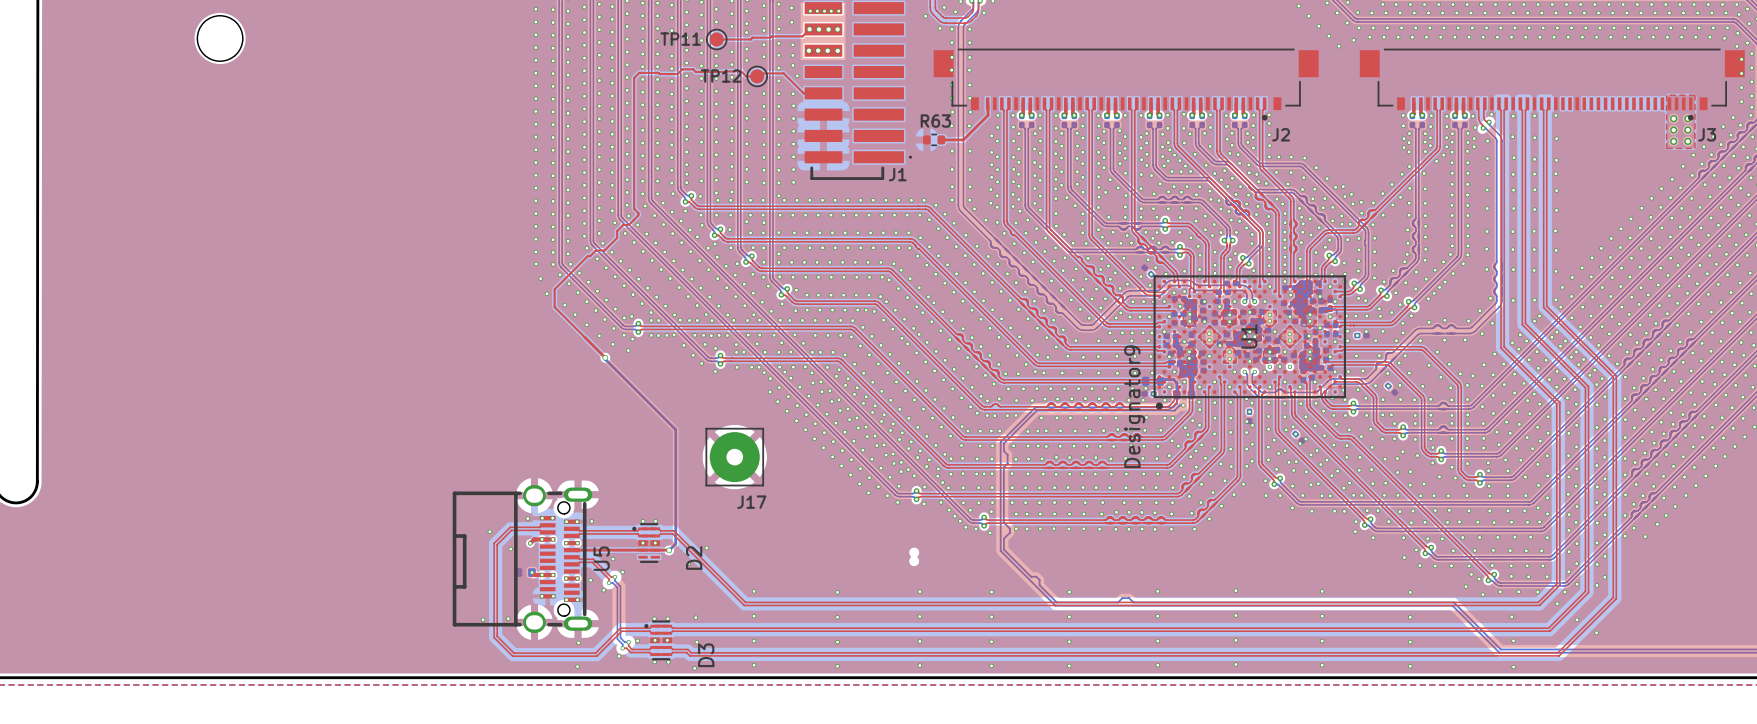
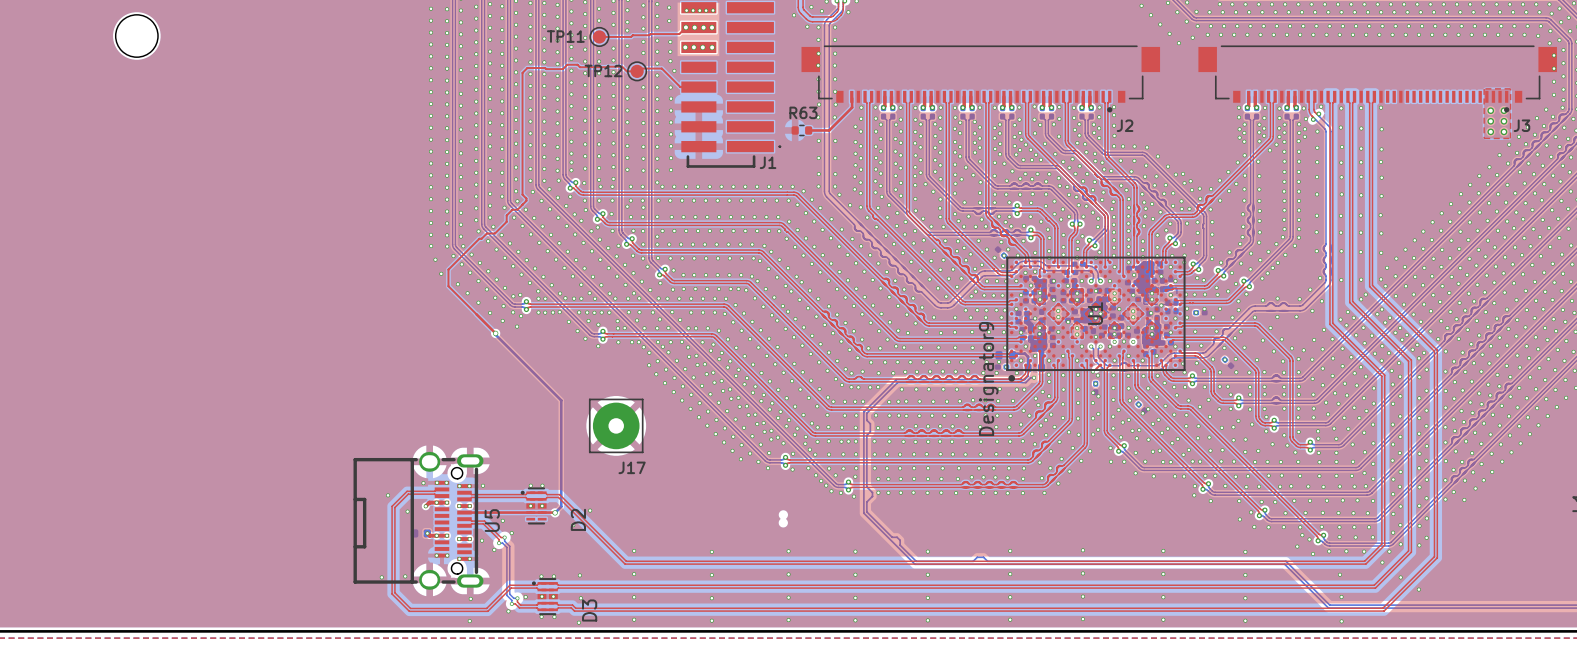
top track: none -> (1100, 365) (1095, 369)

